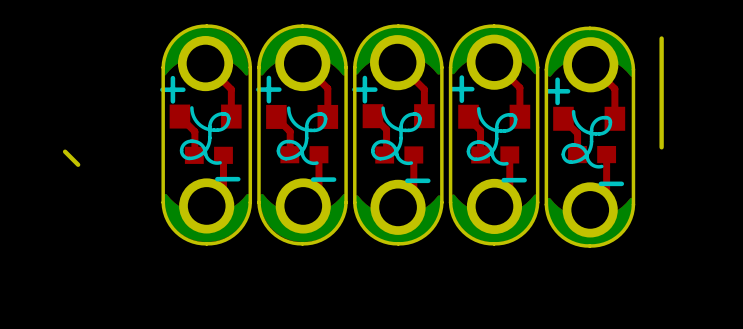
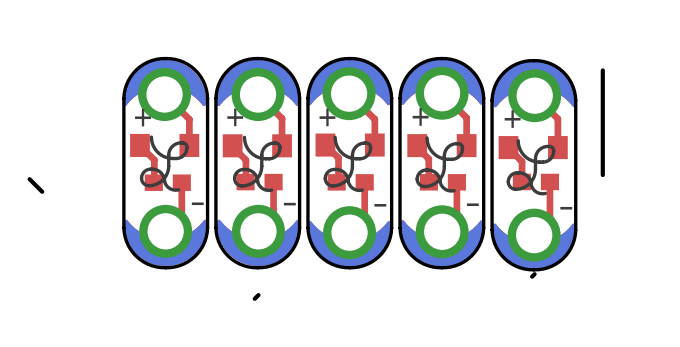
board edge: none -> (534, 274) (532, 276)
board edge: none -> (258, 295) (254, 298)

